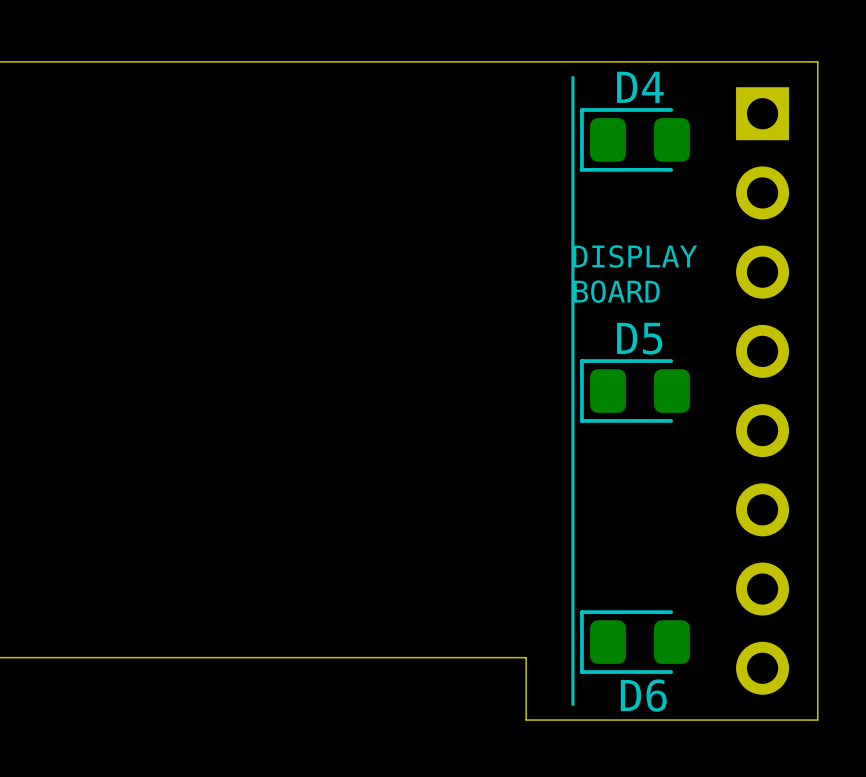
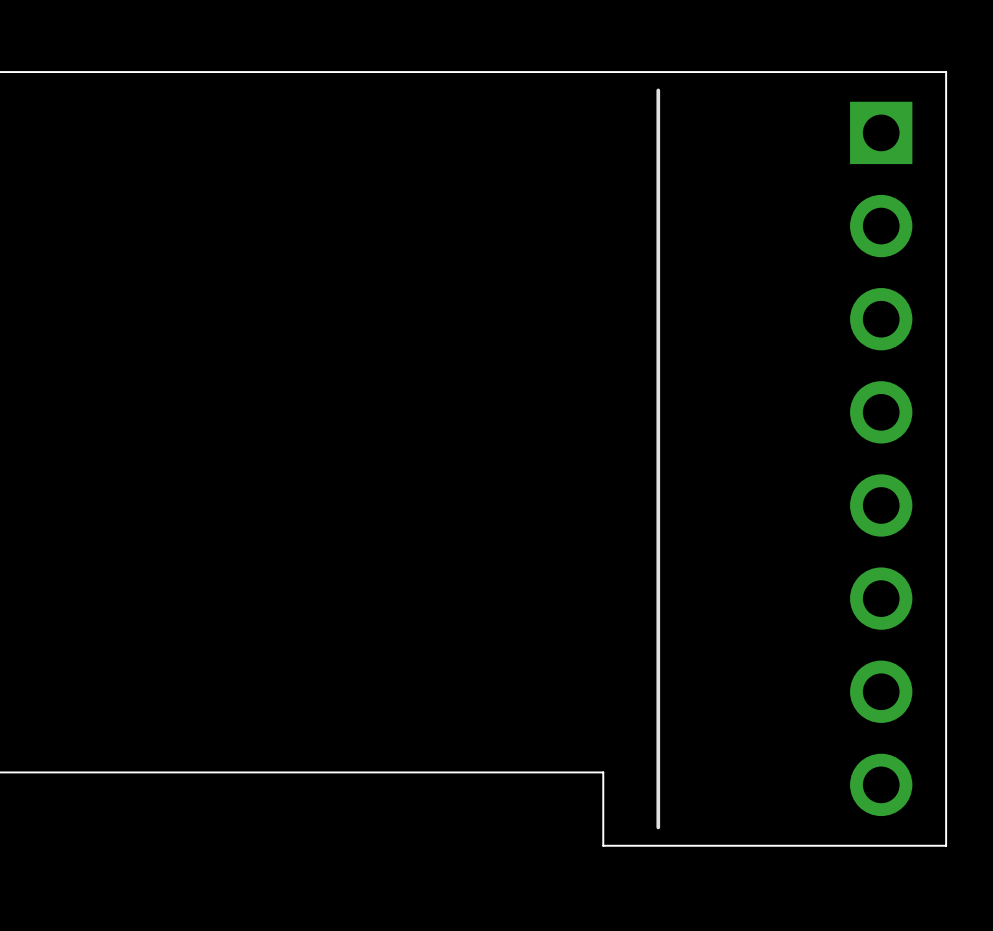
D4: (634, 139) -> none
text: DISPLAY (635, 256) -> none
text: BOARD (616, 291) -> none
D5: (634, 390) -> none
D6: (634, 642) -> none

